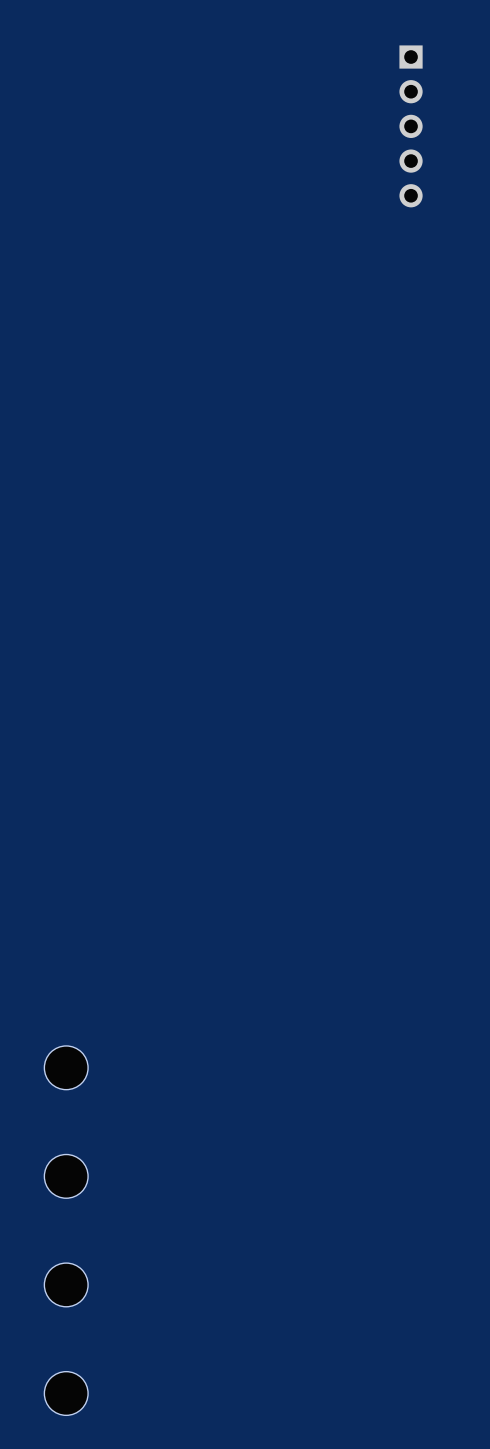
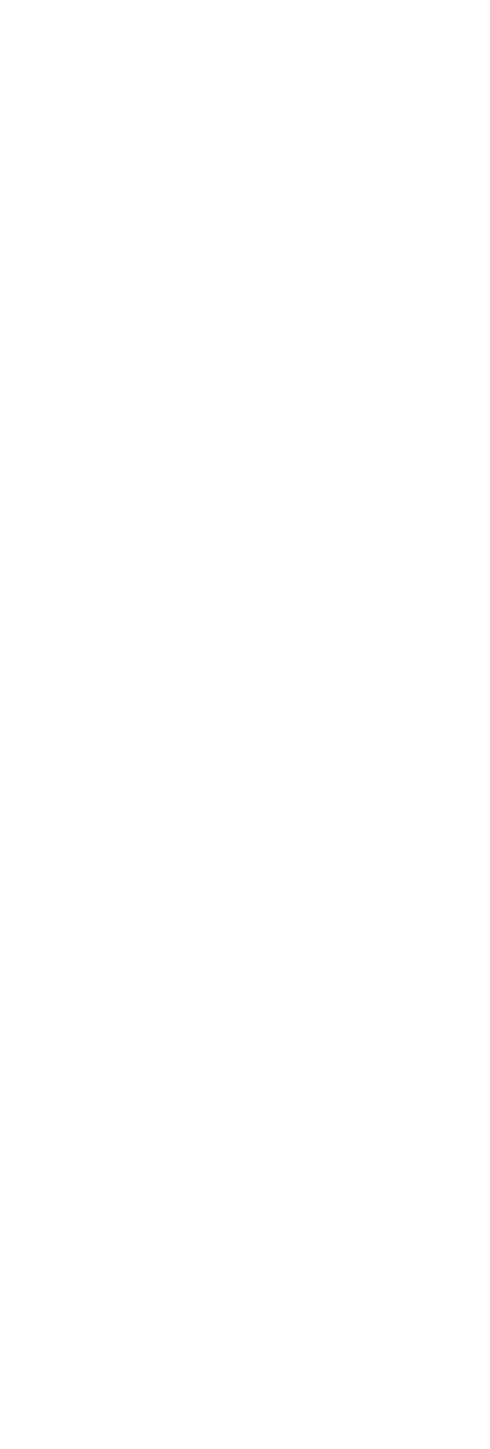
part: (411, 126) -> none
part: (66, 1067) -> none
part: (66, 1176) -> none
part: (66, 1284) -> none
part: (66, 1393) -> none

